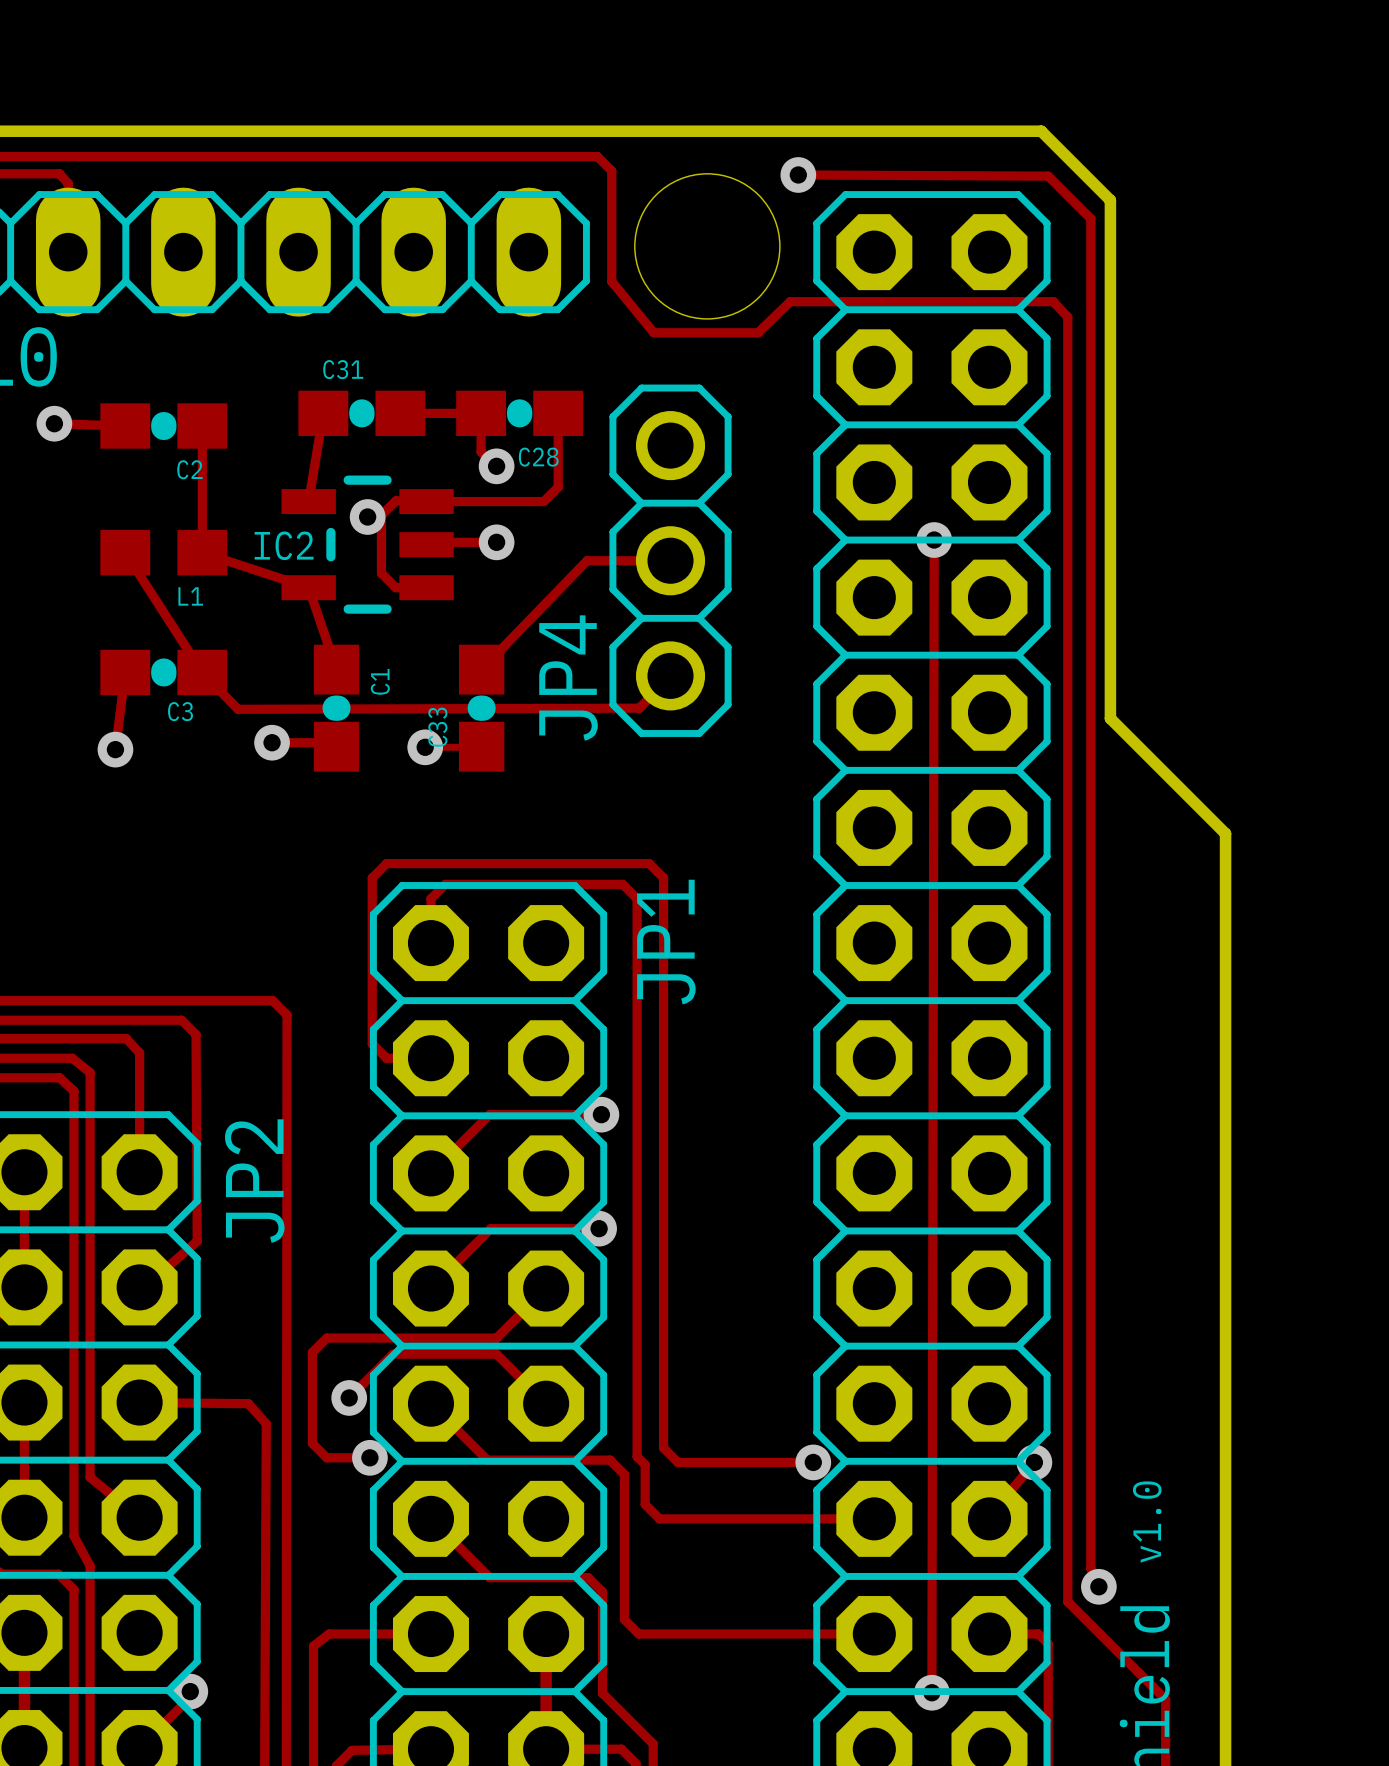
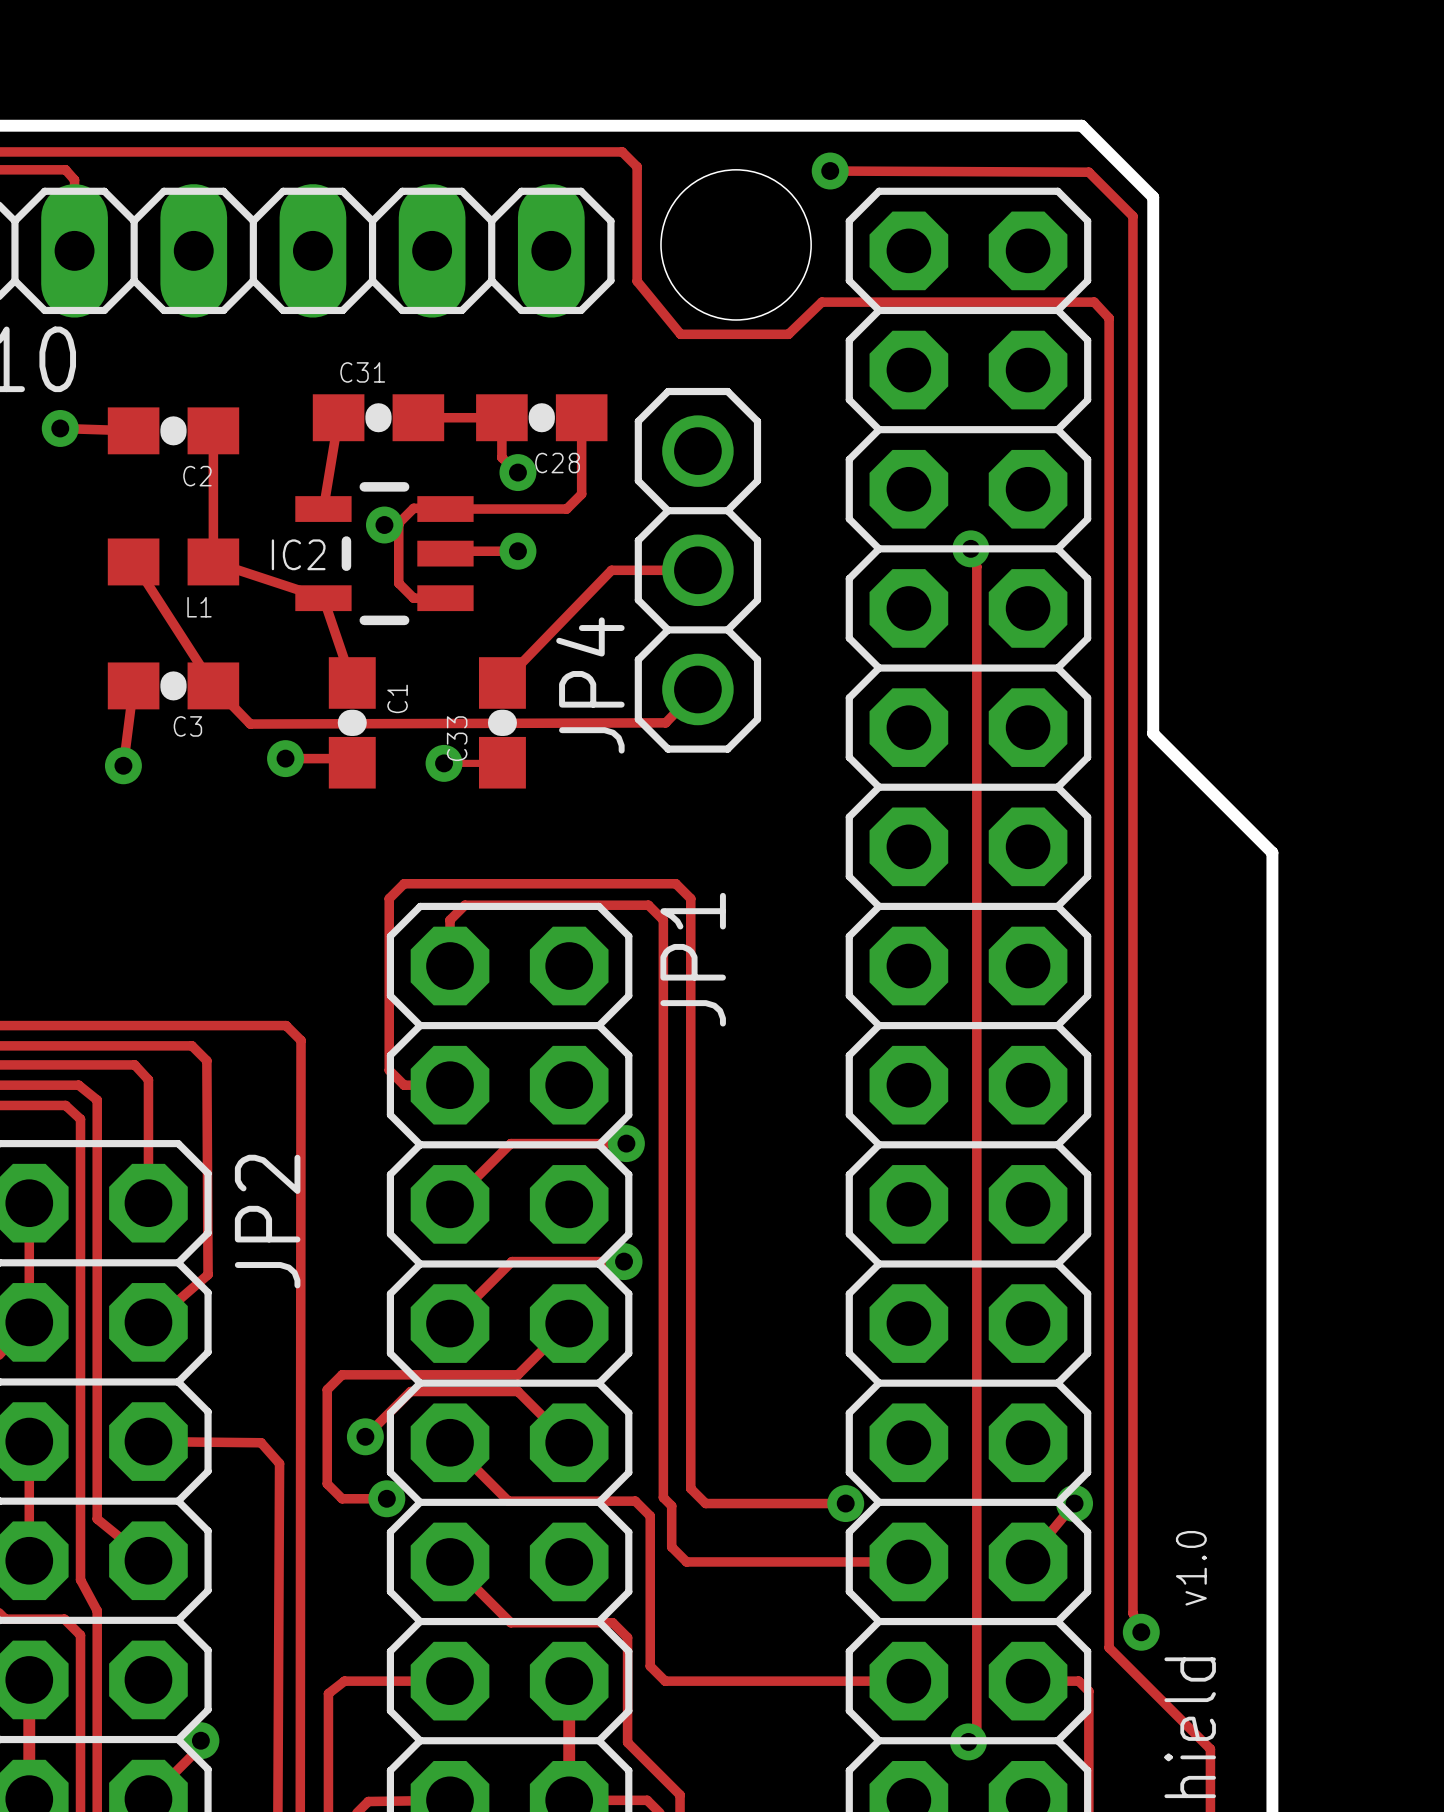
track: (934, 540) (931, 1692) -> none
track: none -> (972, 552) (976, 566) (976, 1732) (973, 1741)

